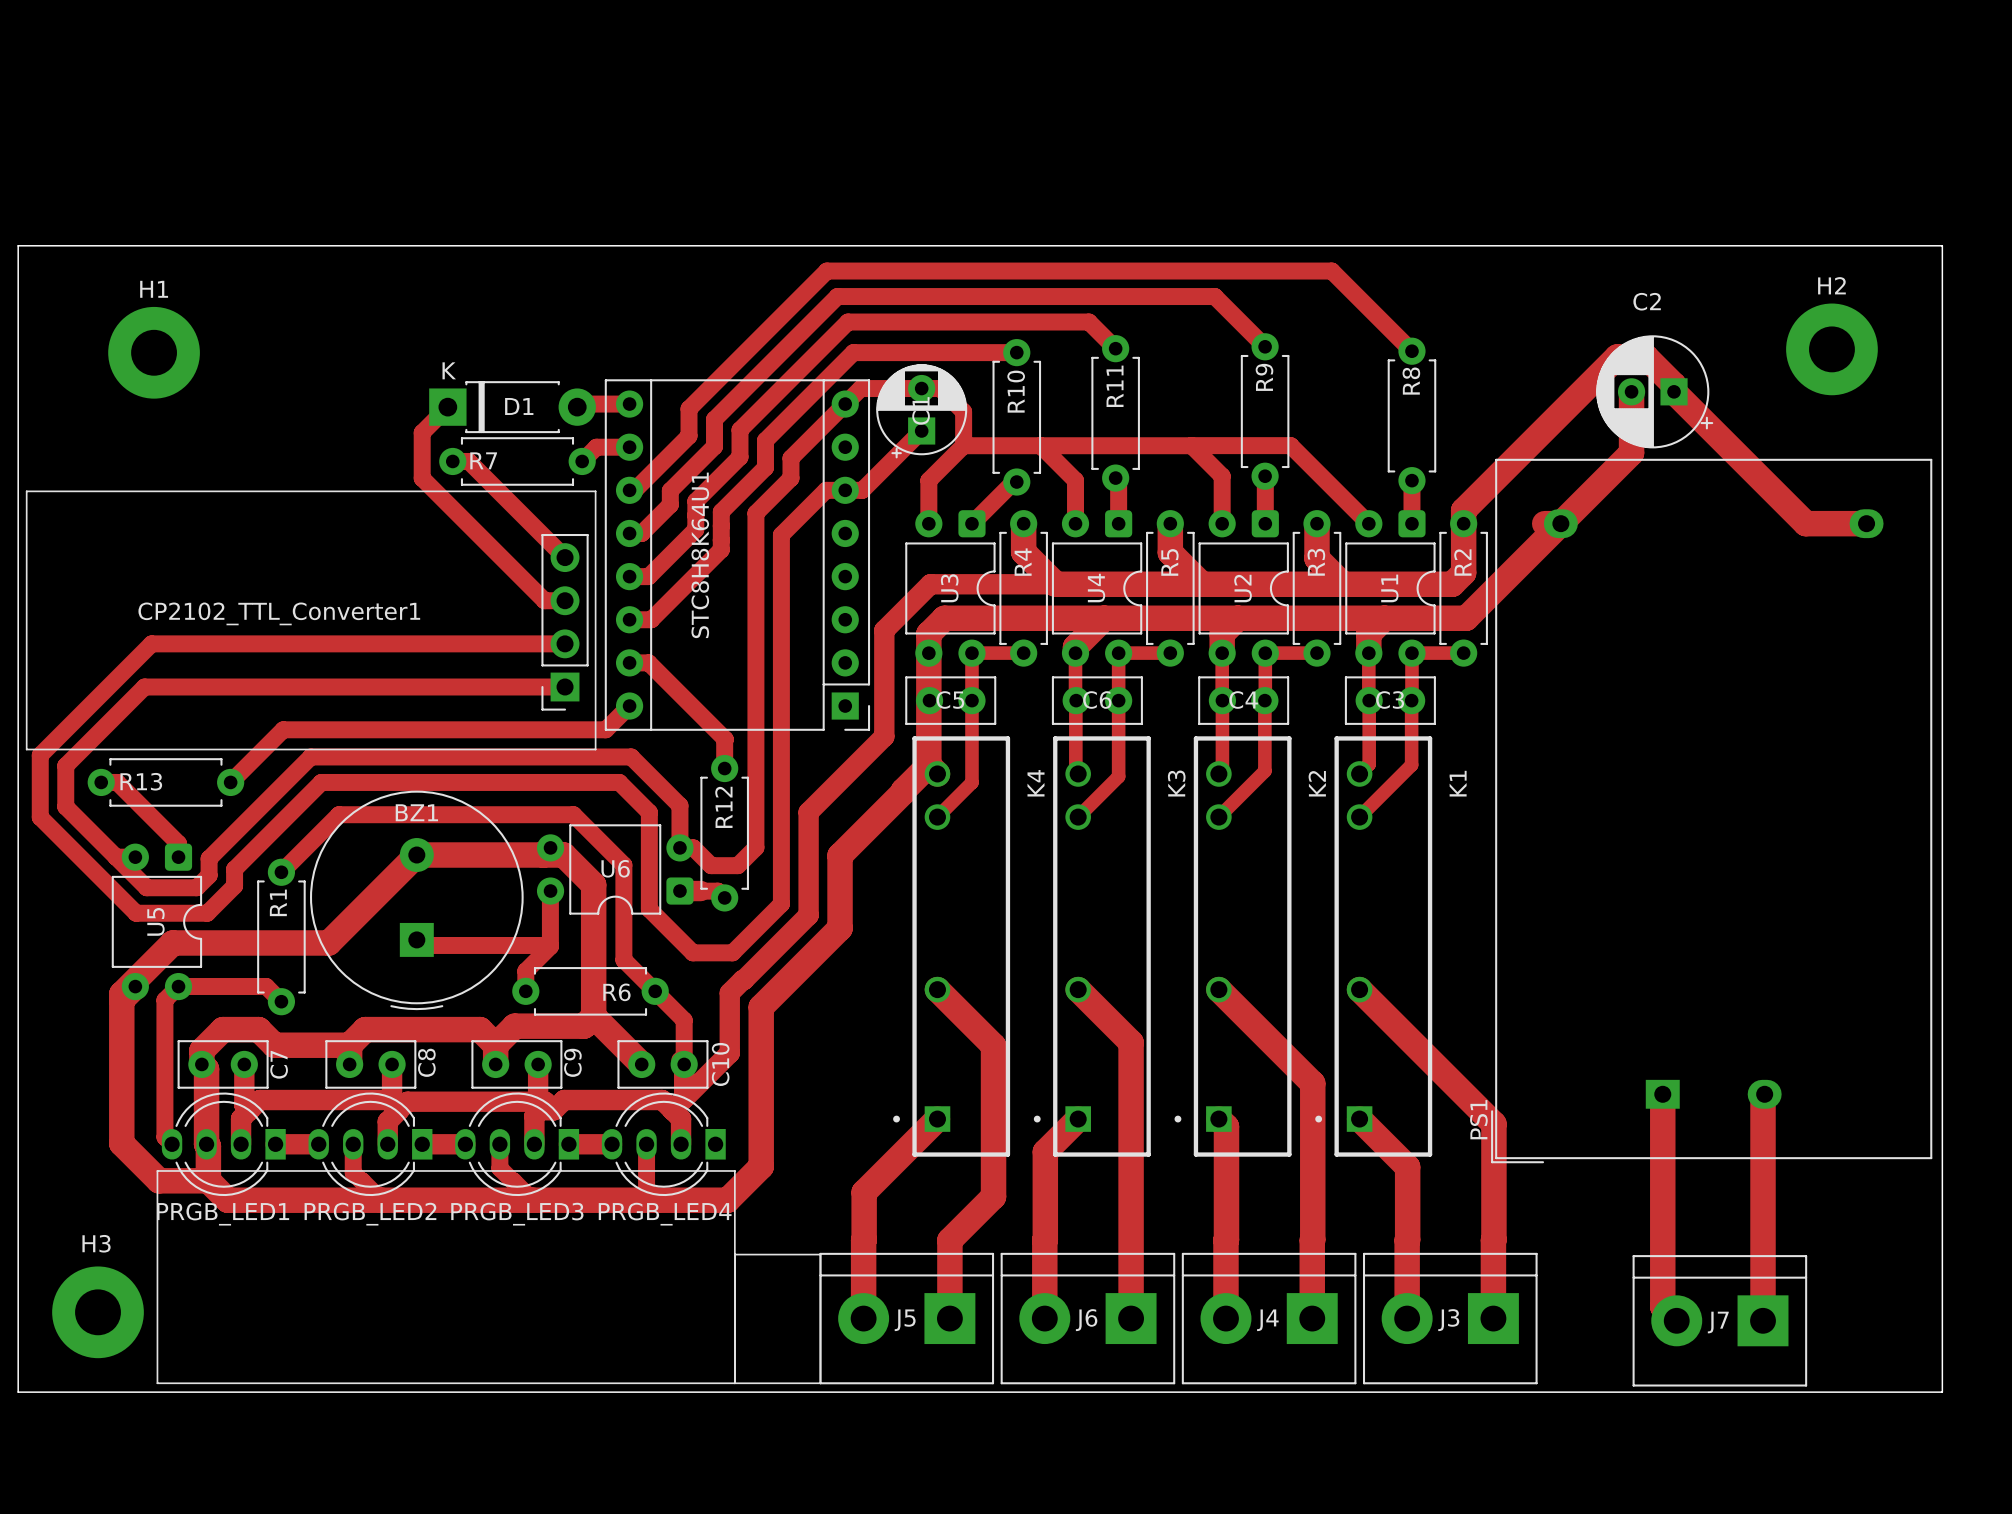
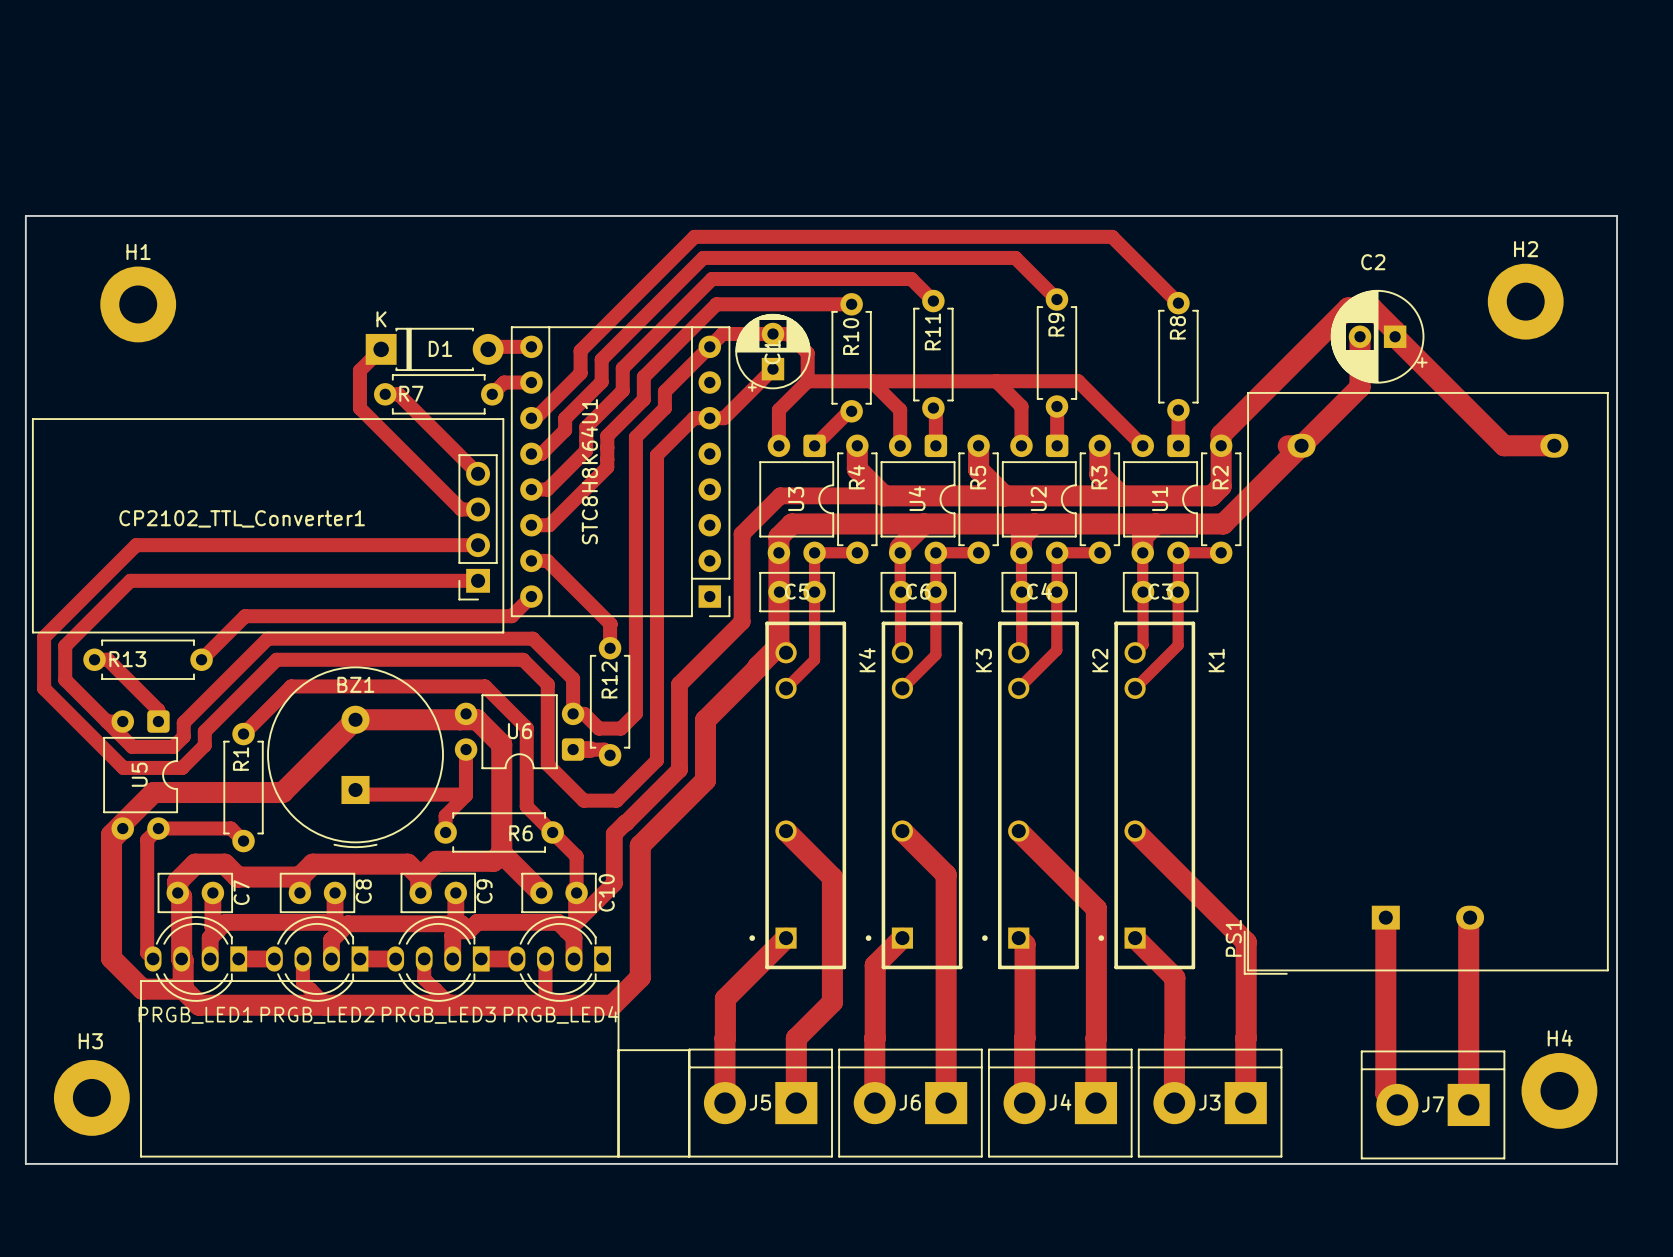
H4: none -> (1559, 1090)

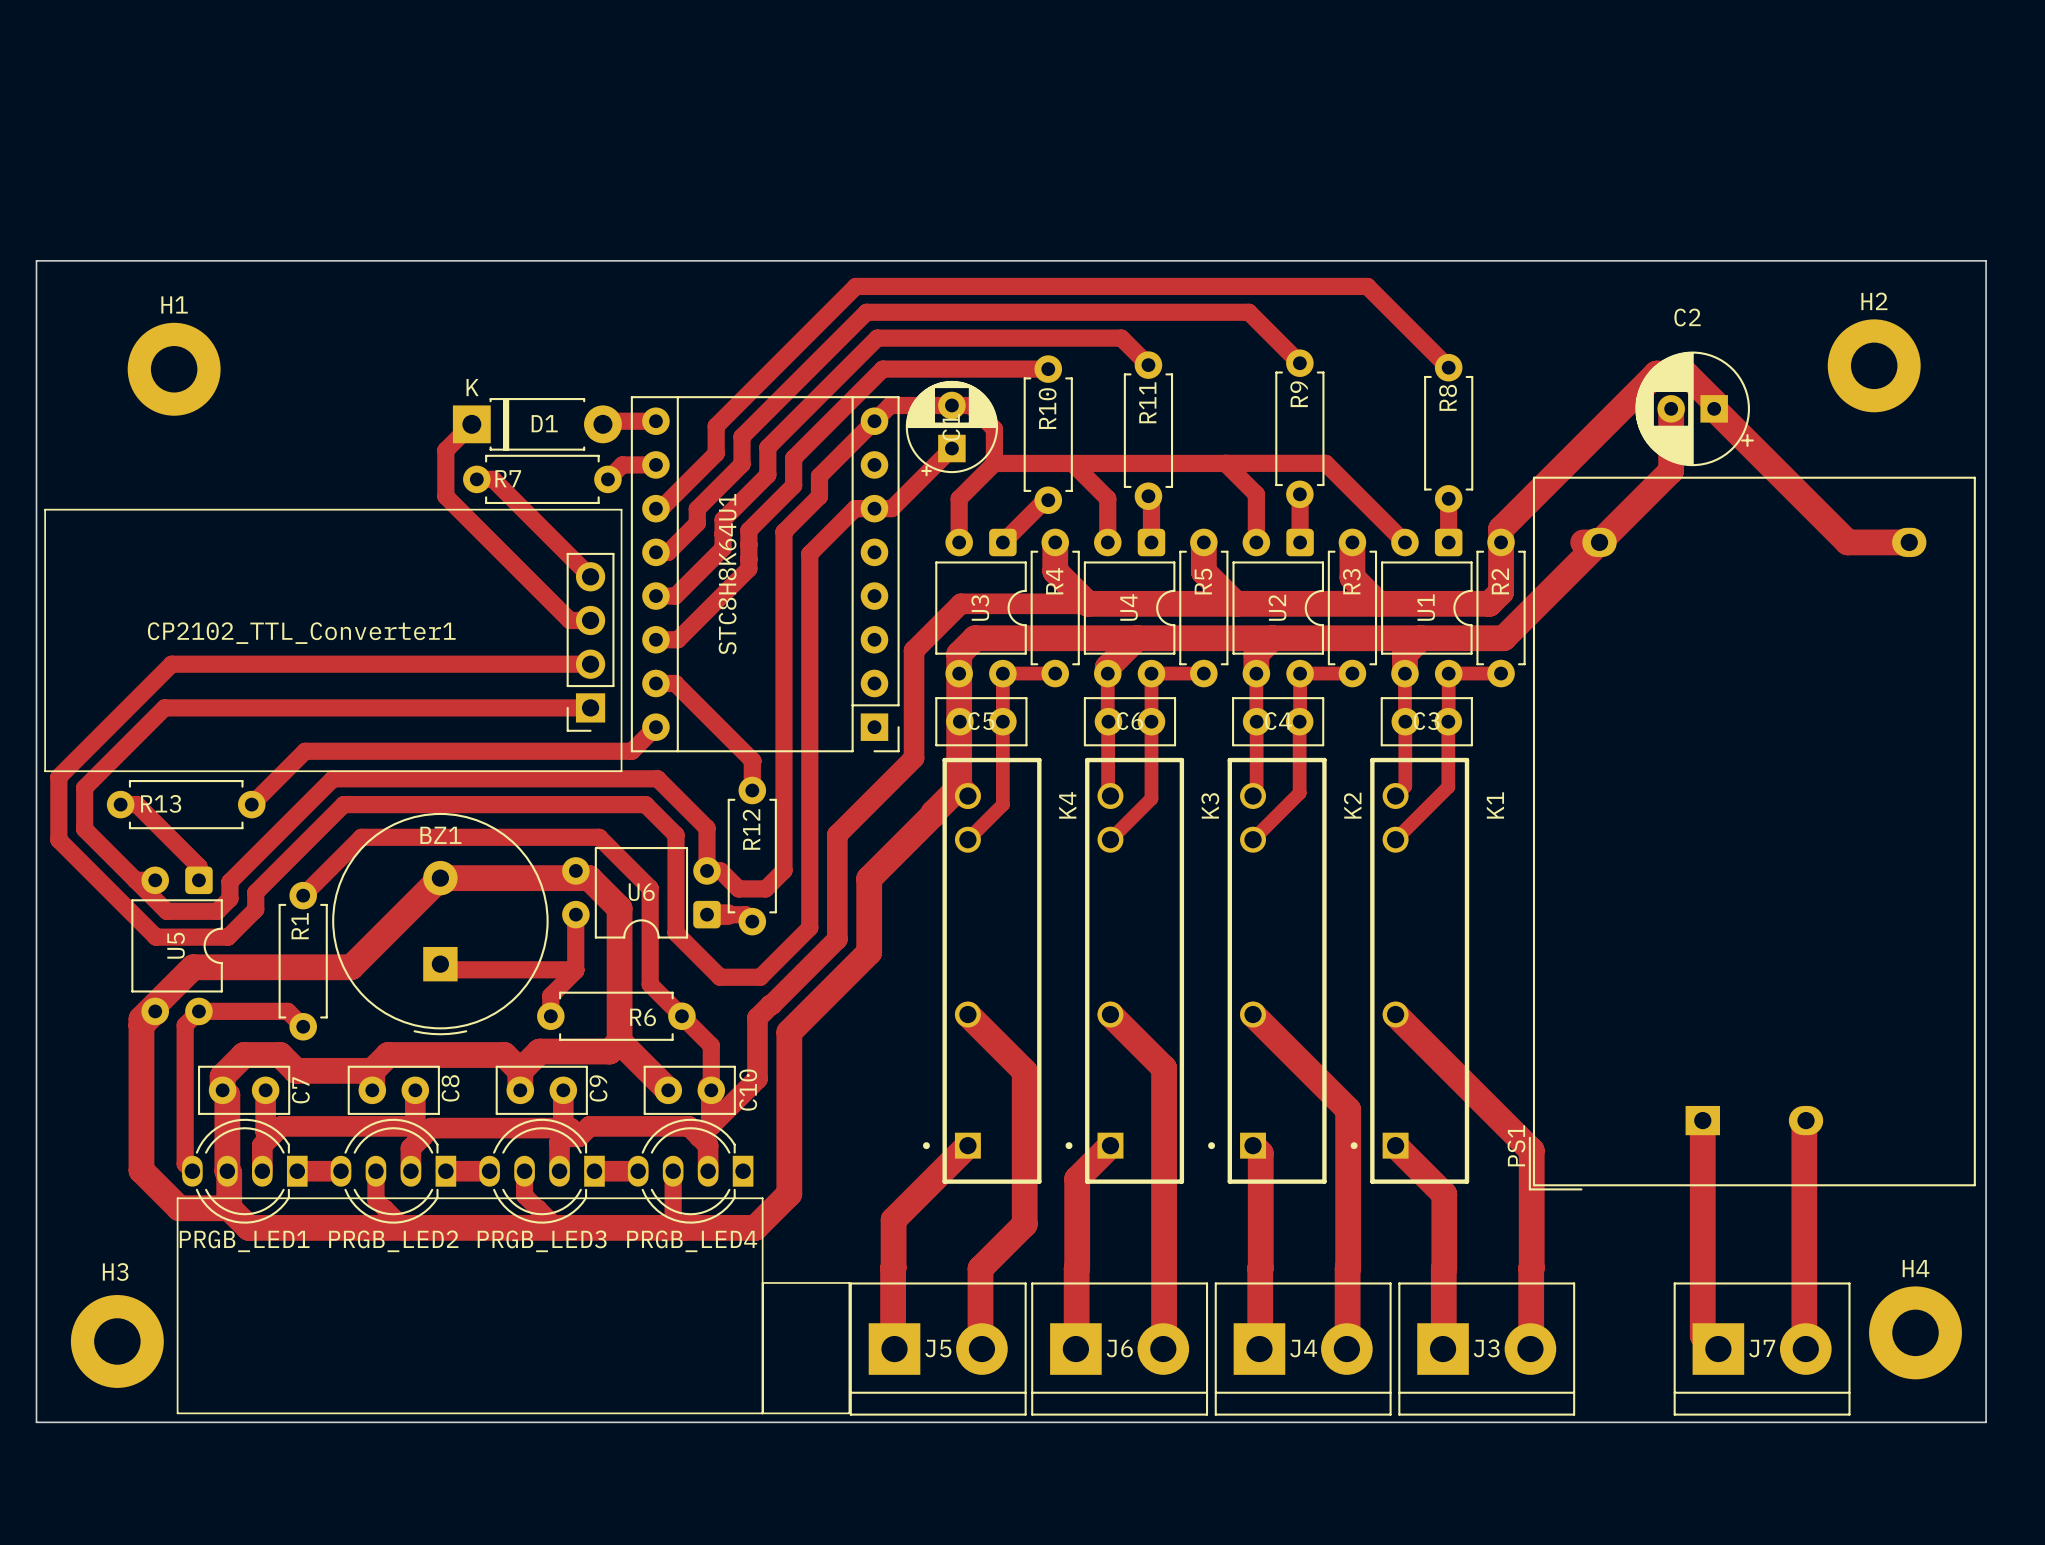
J5 rotation: 0° (760, 1103) -> 180° (938, 1349)
J6 rotation: 0° (910, 1103) -> 180° (1119, 1349)
J4 rotation: 0° (1060, 1103) -> 180° (1303, 1349)
J3 rotation: 0° (1210, 1103) -> 180° (1486, 1349)
J7 rotation: 0° (1433, 1104) -> 180° (1762, 1349)

